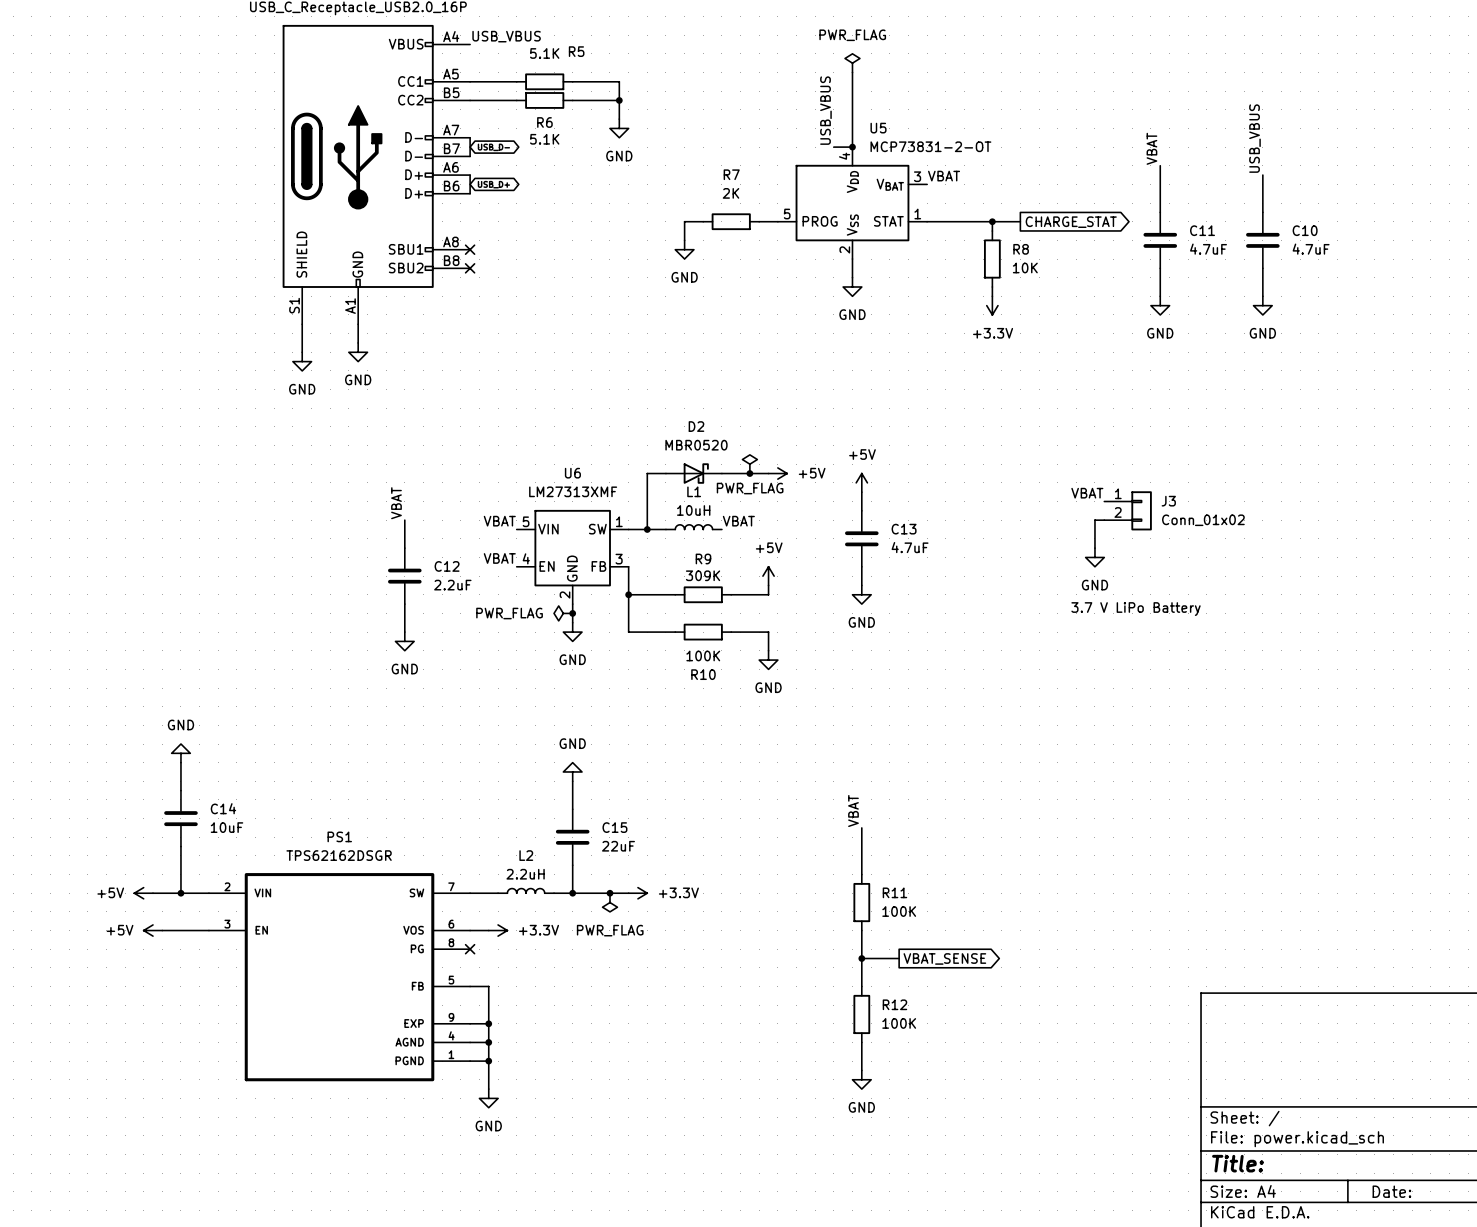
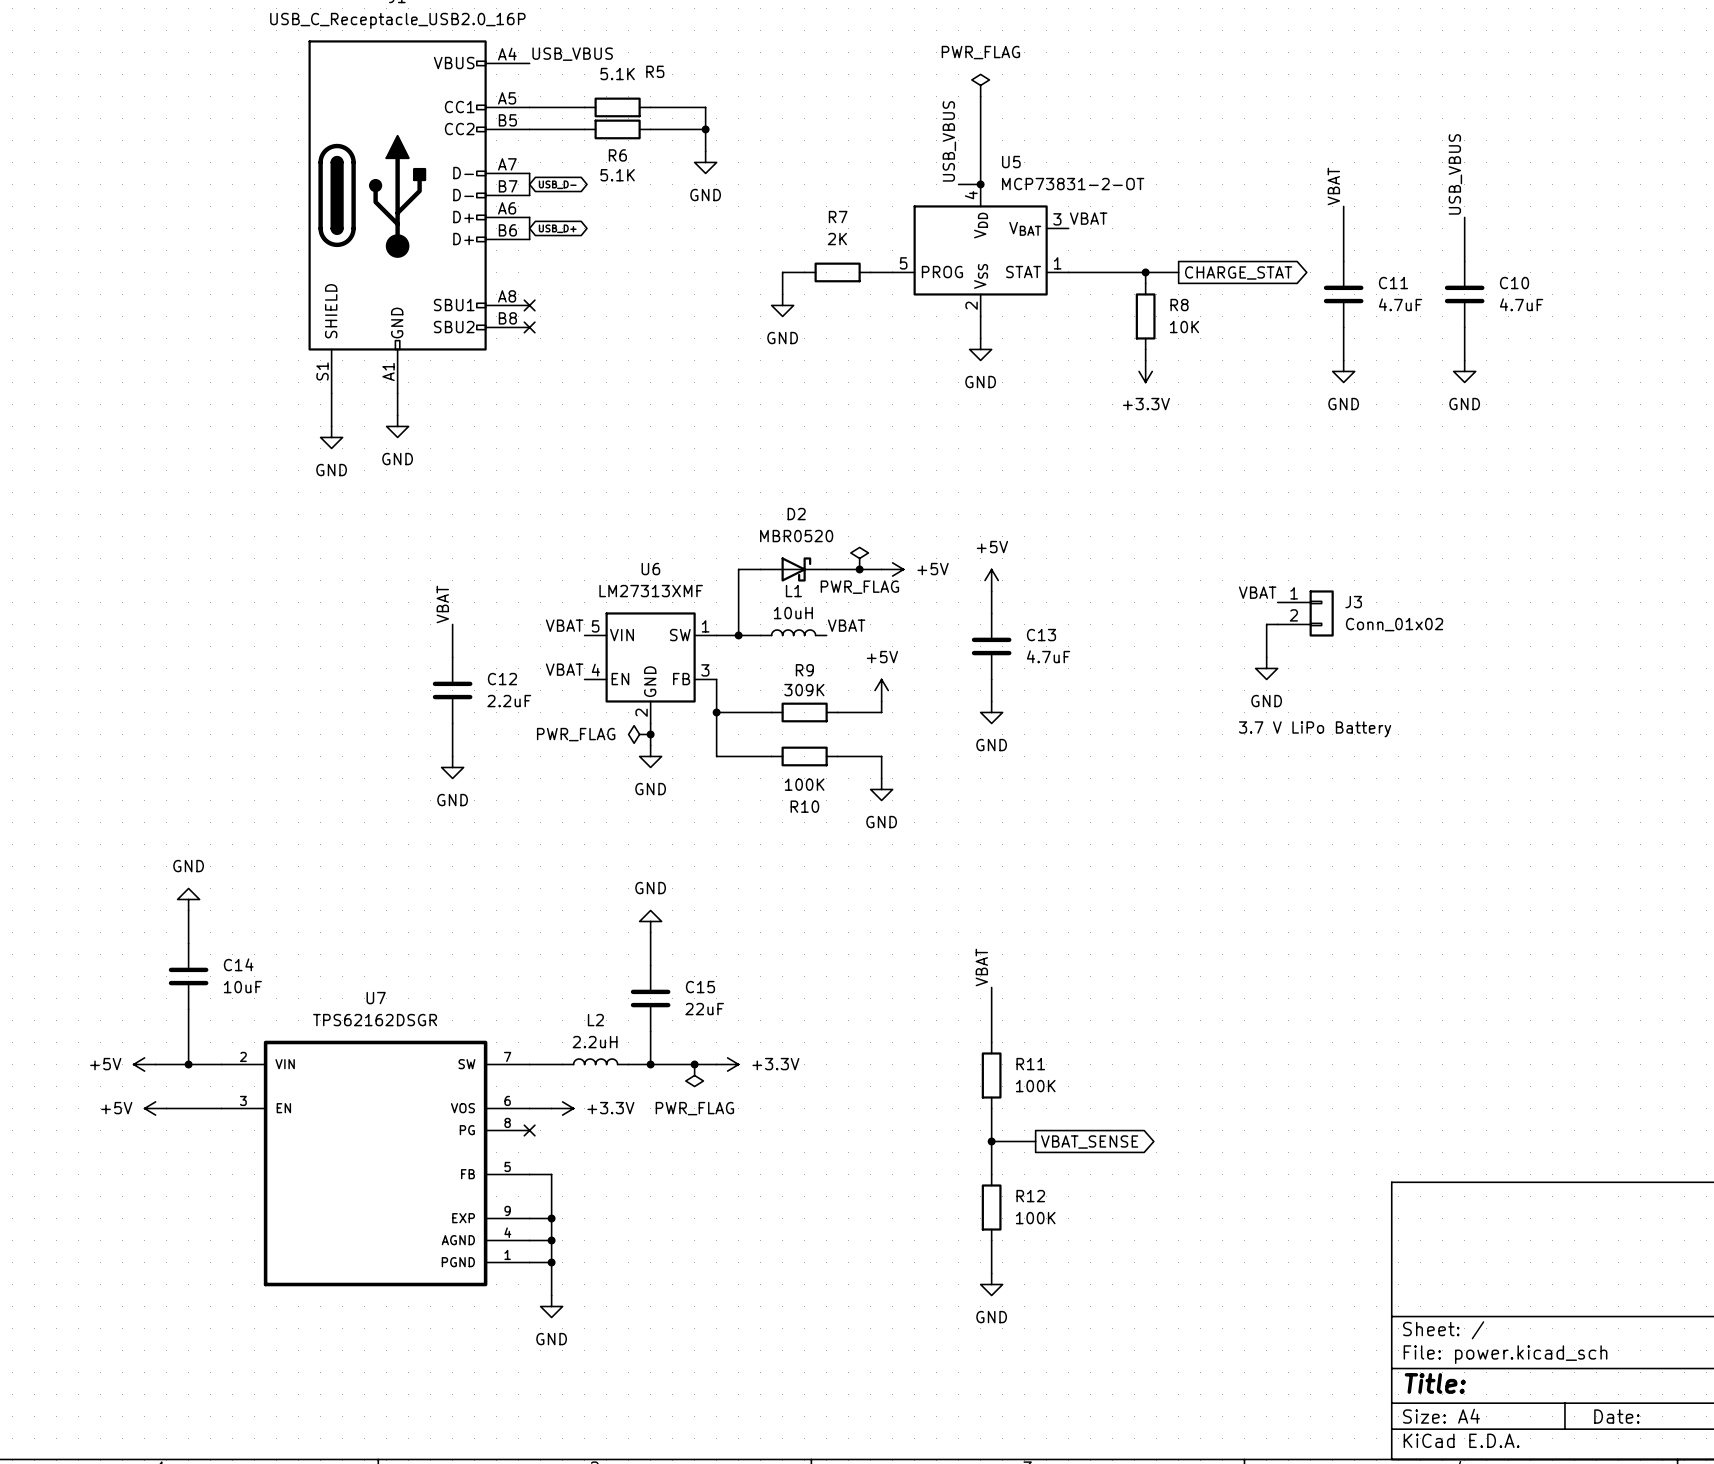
PS1 name: PS1 (339, 836) -> U7 (376, 998)

